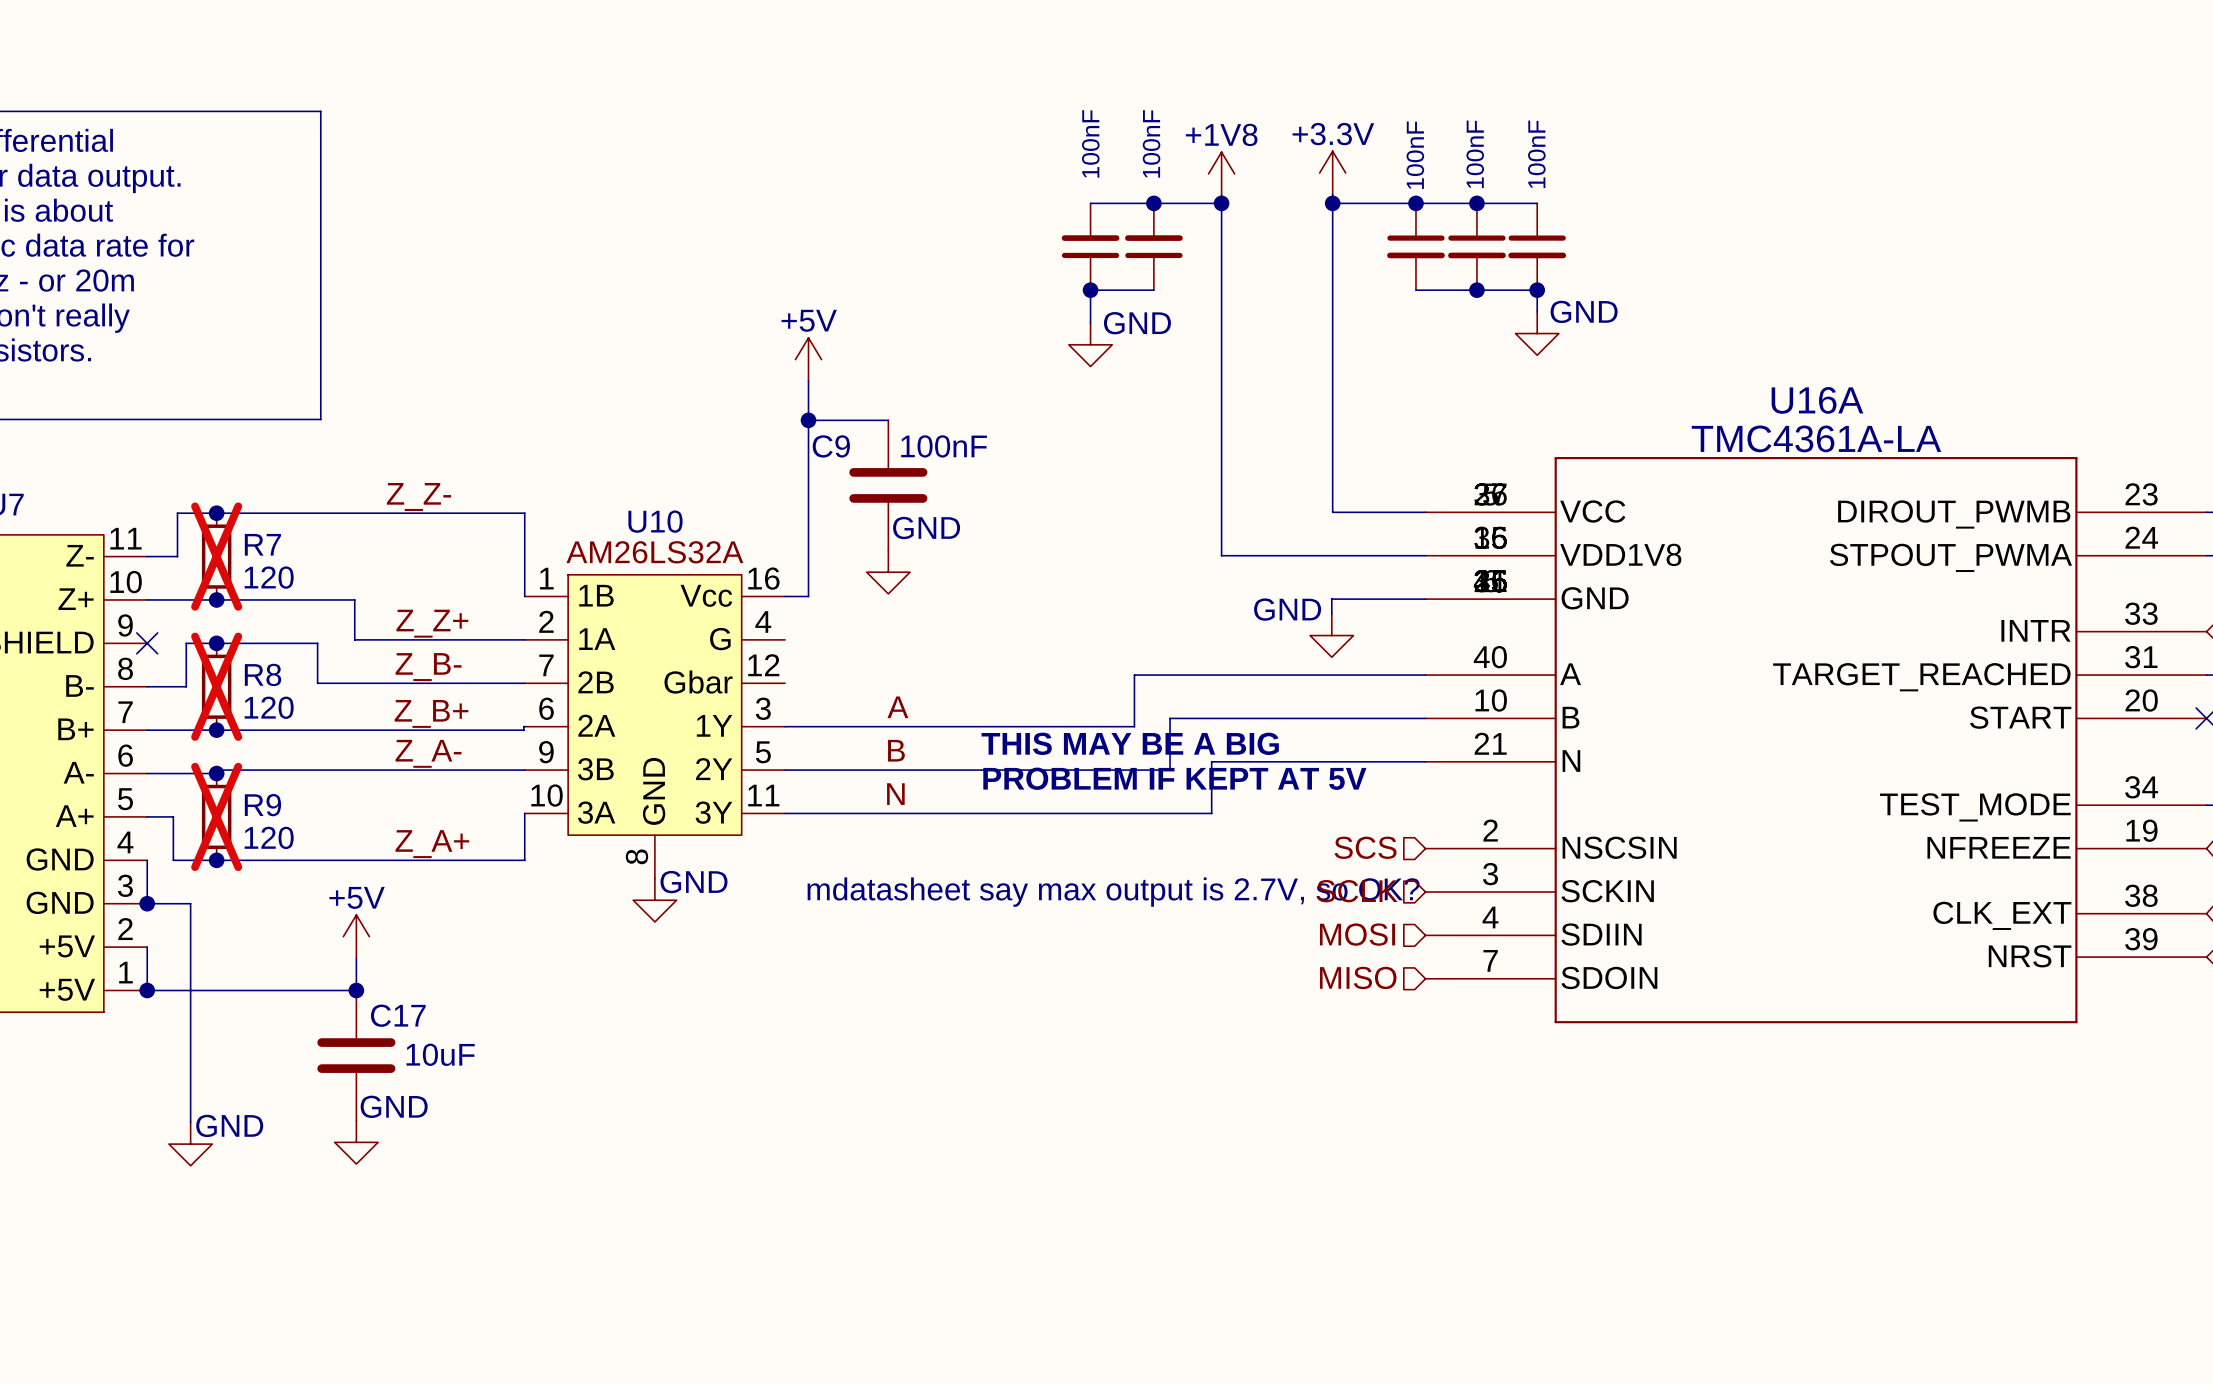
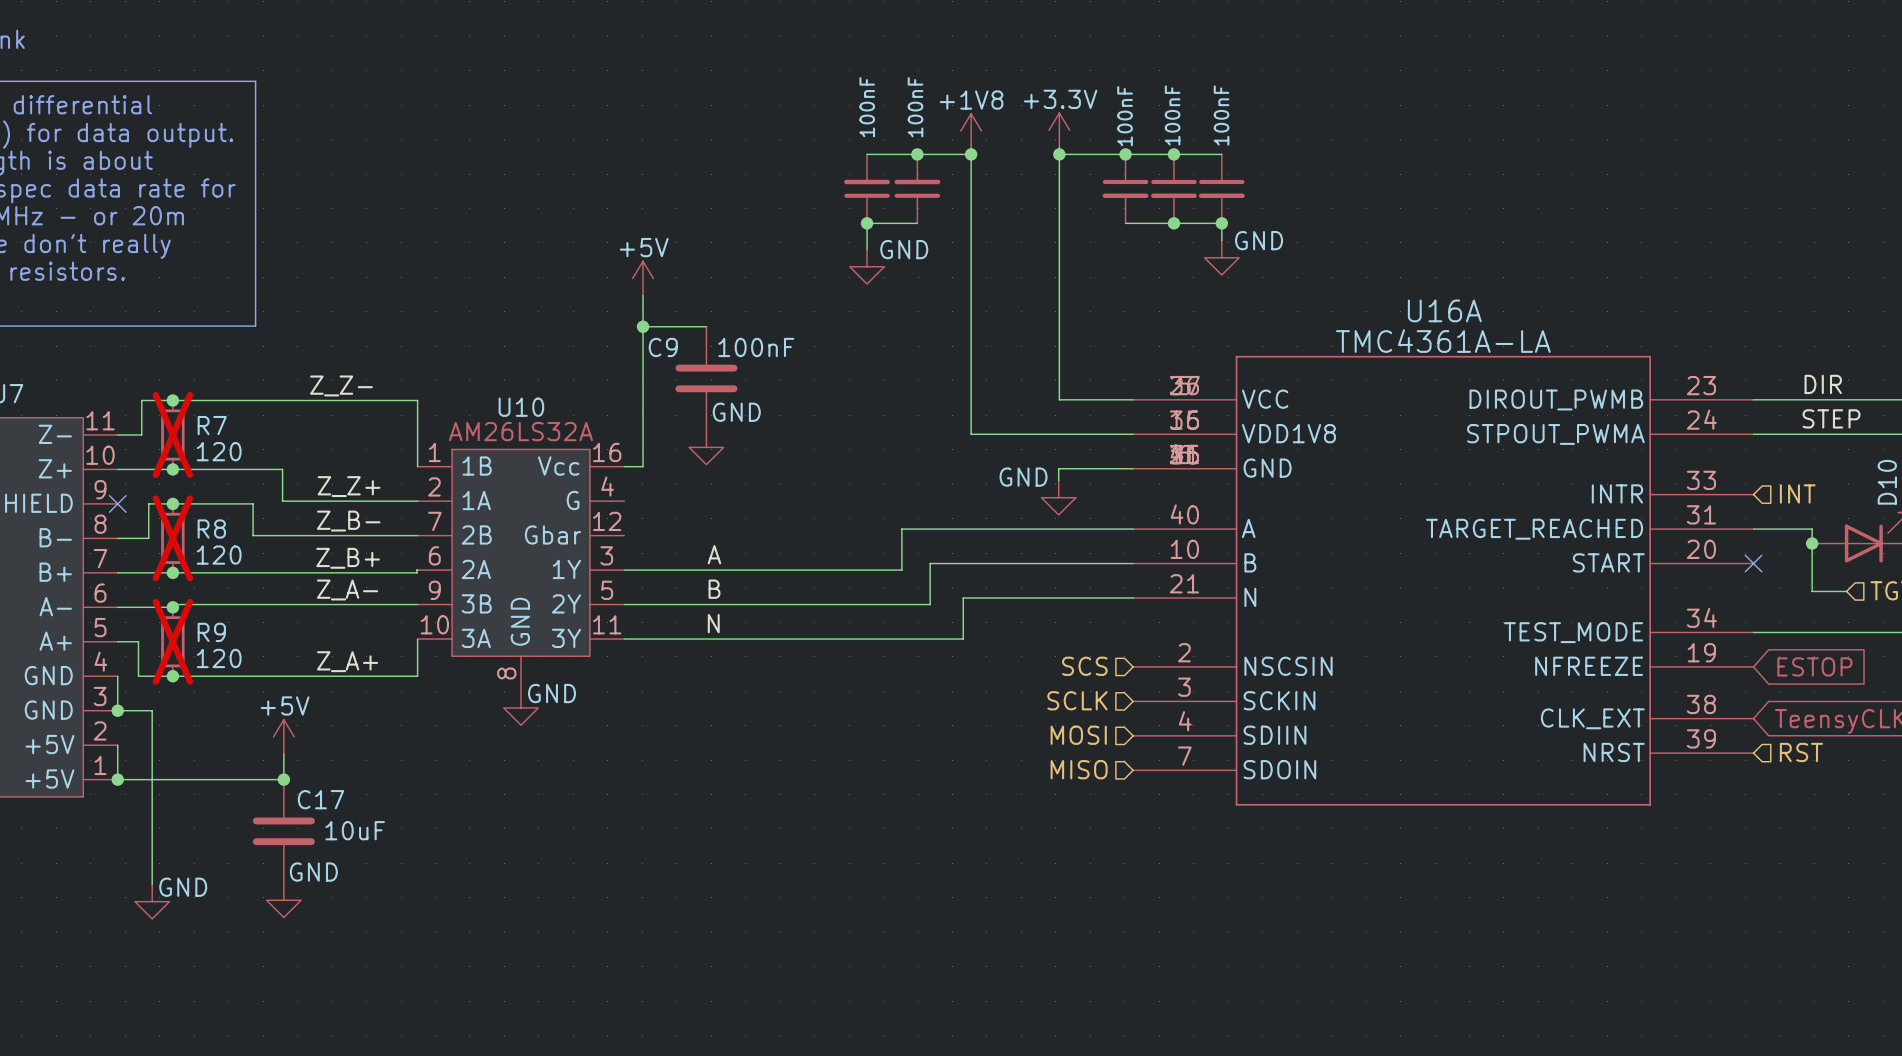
text: THIS MAY BE A BIG (1130, 743) -> none
text: PROBLEM IF KEPT AT 5V (1174, 778) -> none
text: mdatasheet say max output is 2.7V, so OK? (1113, 892) -> none

